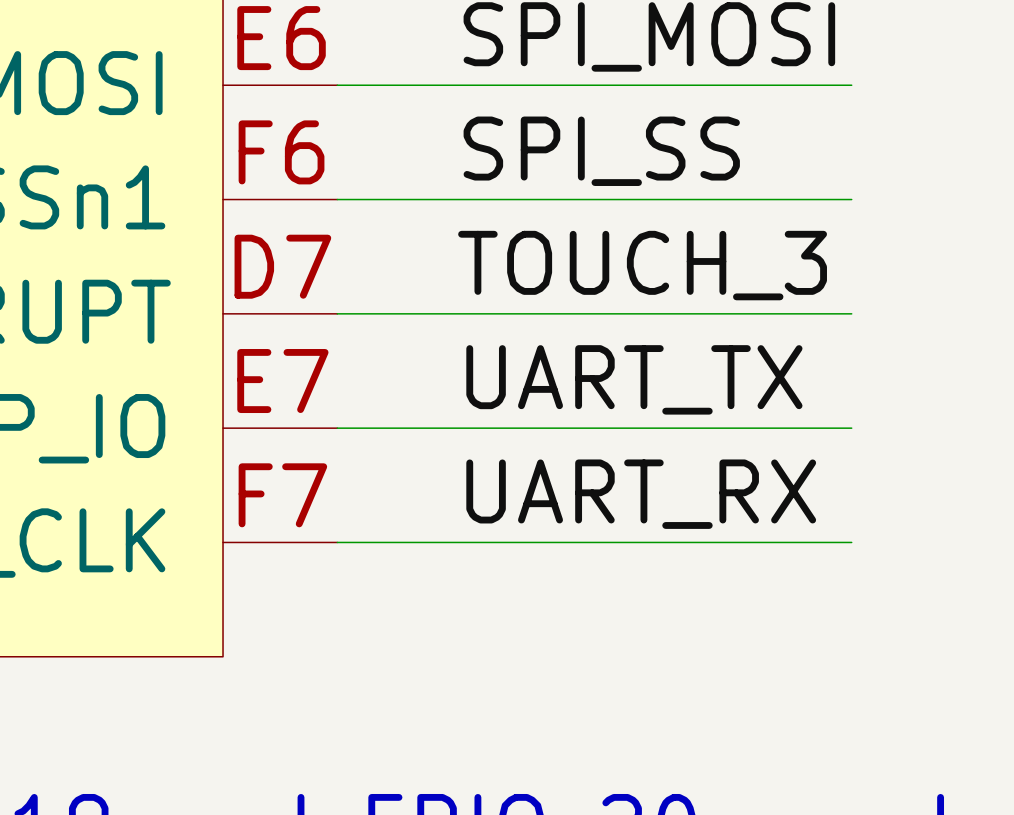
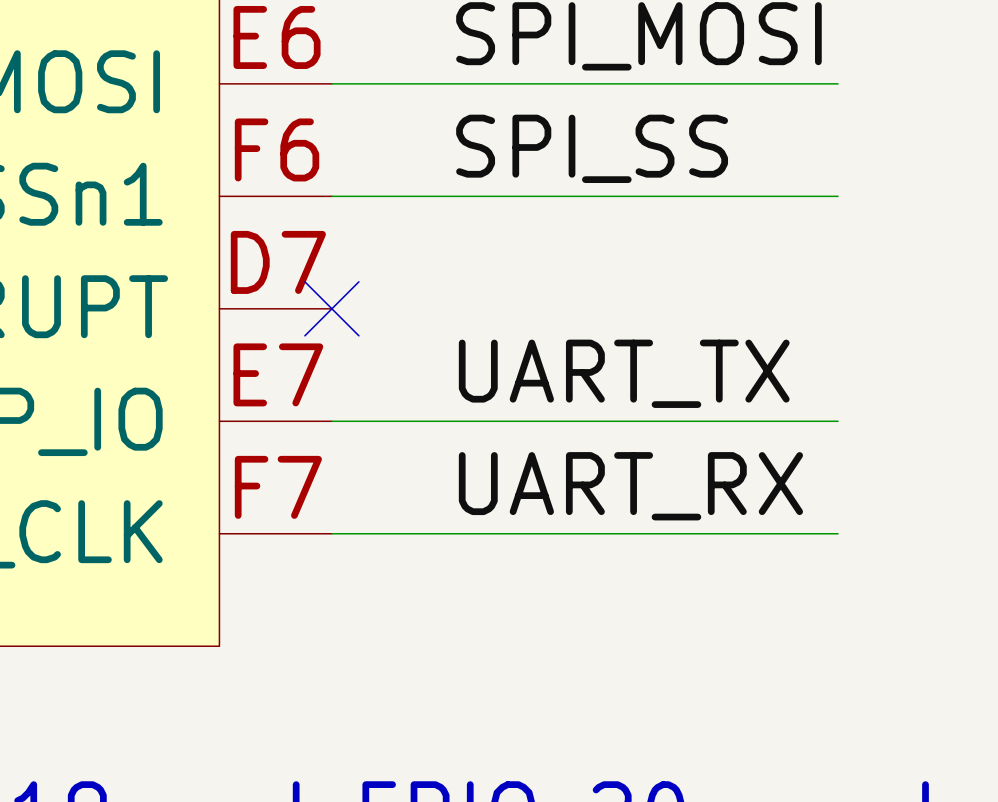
label: TOUCH_3 (642, 265) -> none
wire: (337, 313) (851, 313) -> none
no-connect mark: none -> (331, 308)

